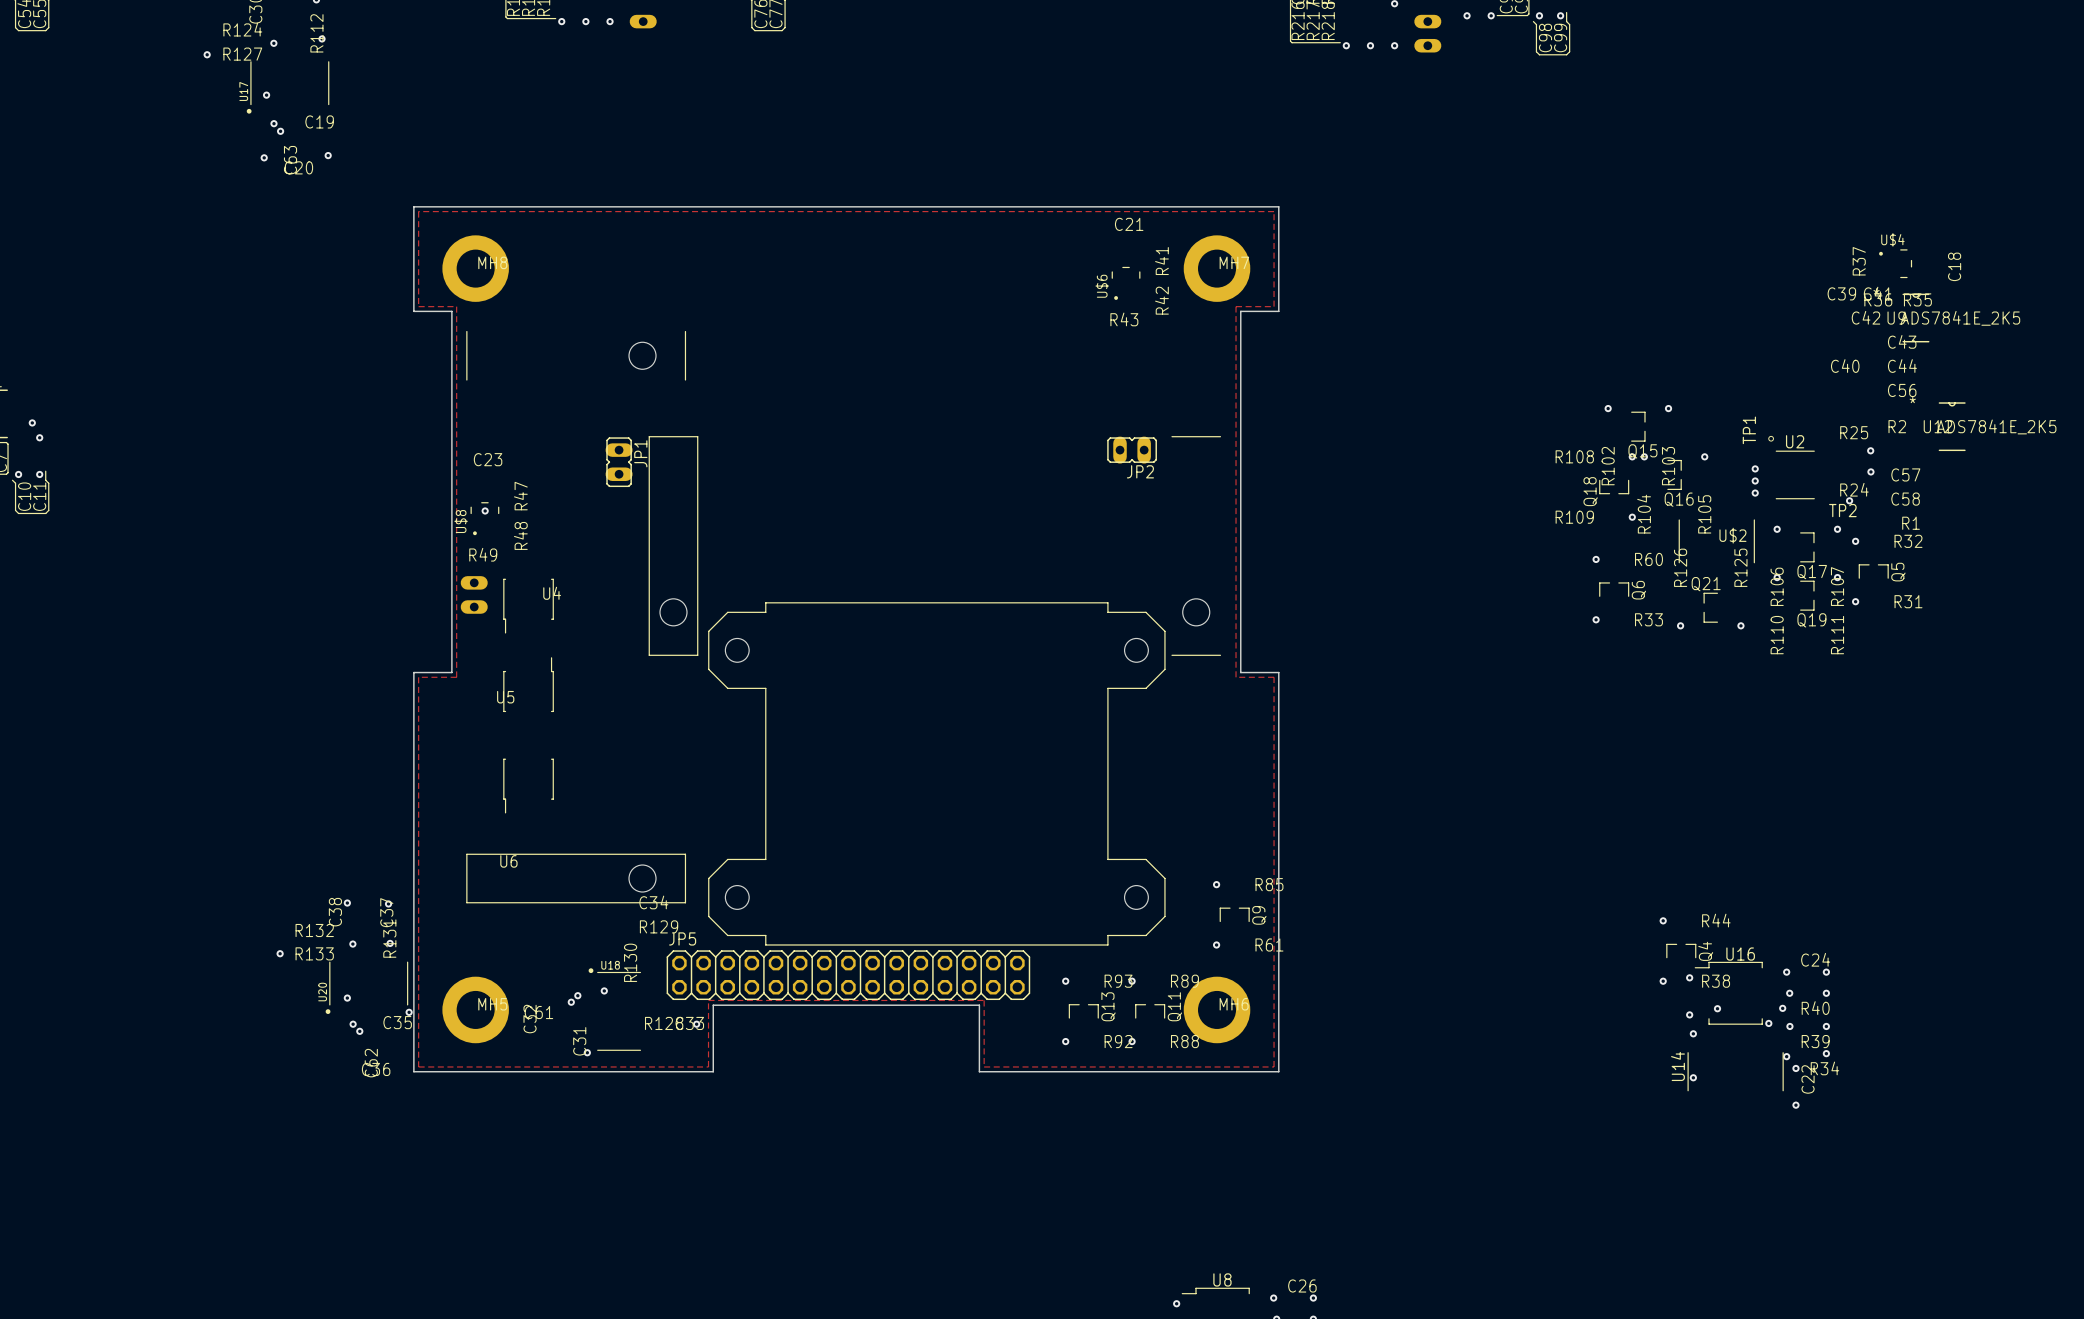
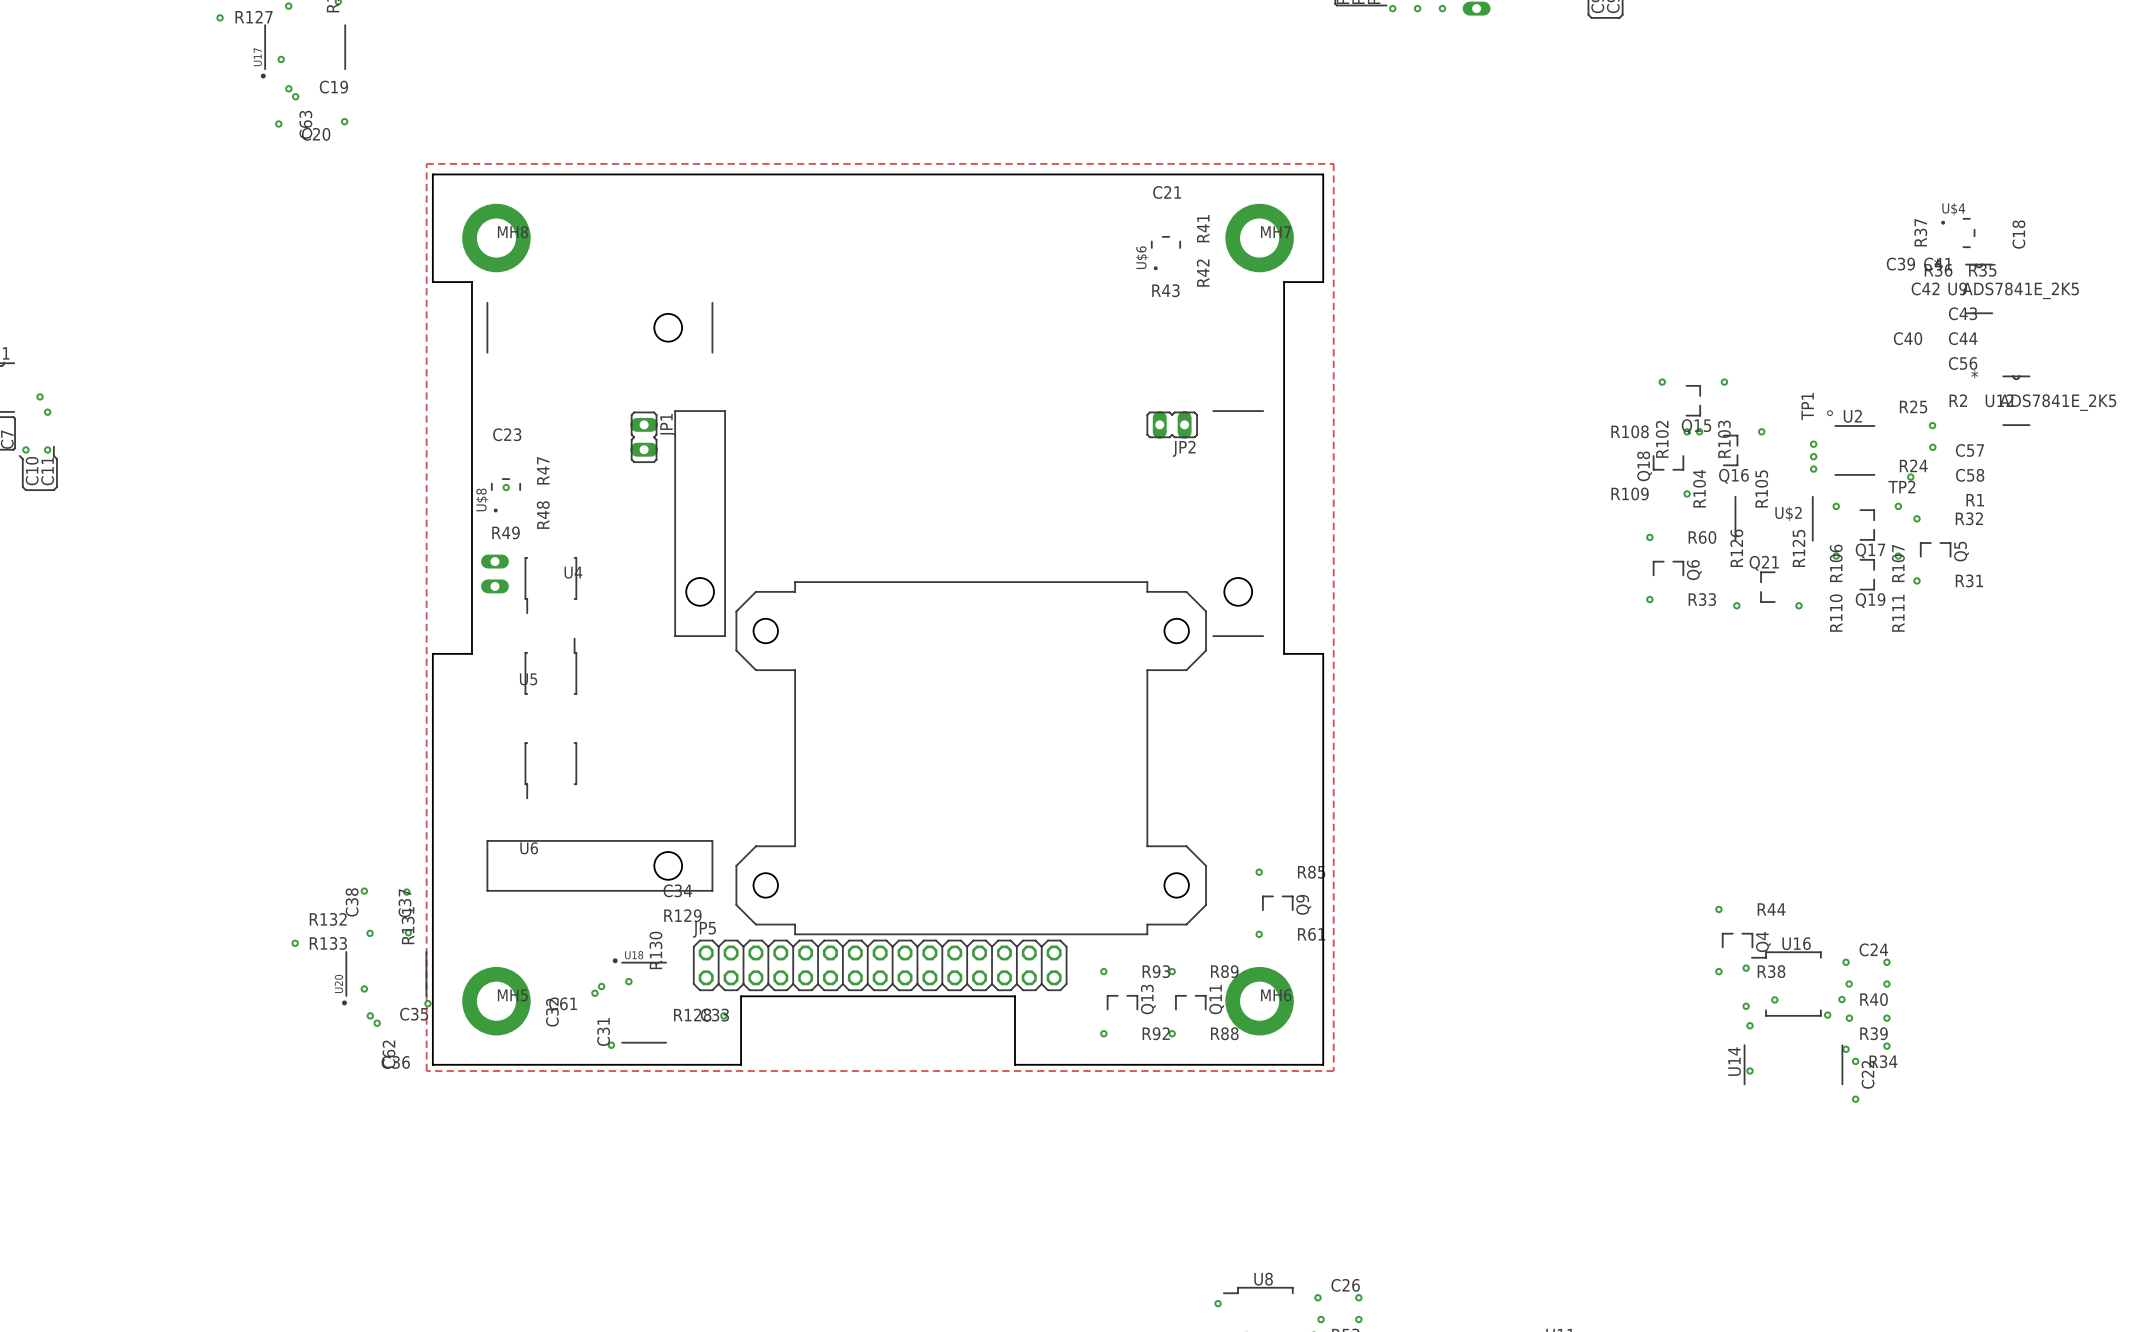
zone outline: (418, 211) (1274, 211) (1274, 306) (1236, 306) (1236, 677) (1274, 677) (1274, 1066) (984, 1066) (984, 1000) (708, 1000) (708, 1066) (418, 1066) (418, 677) (456, 677) (456, 306) (418, 306) (418, 211) -> (426, 163) (426, 1071) (1333, 1071) (1333, 163) (426, 163)

